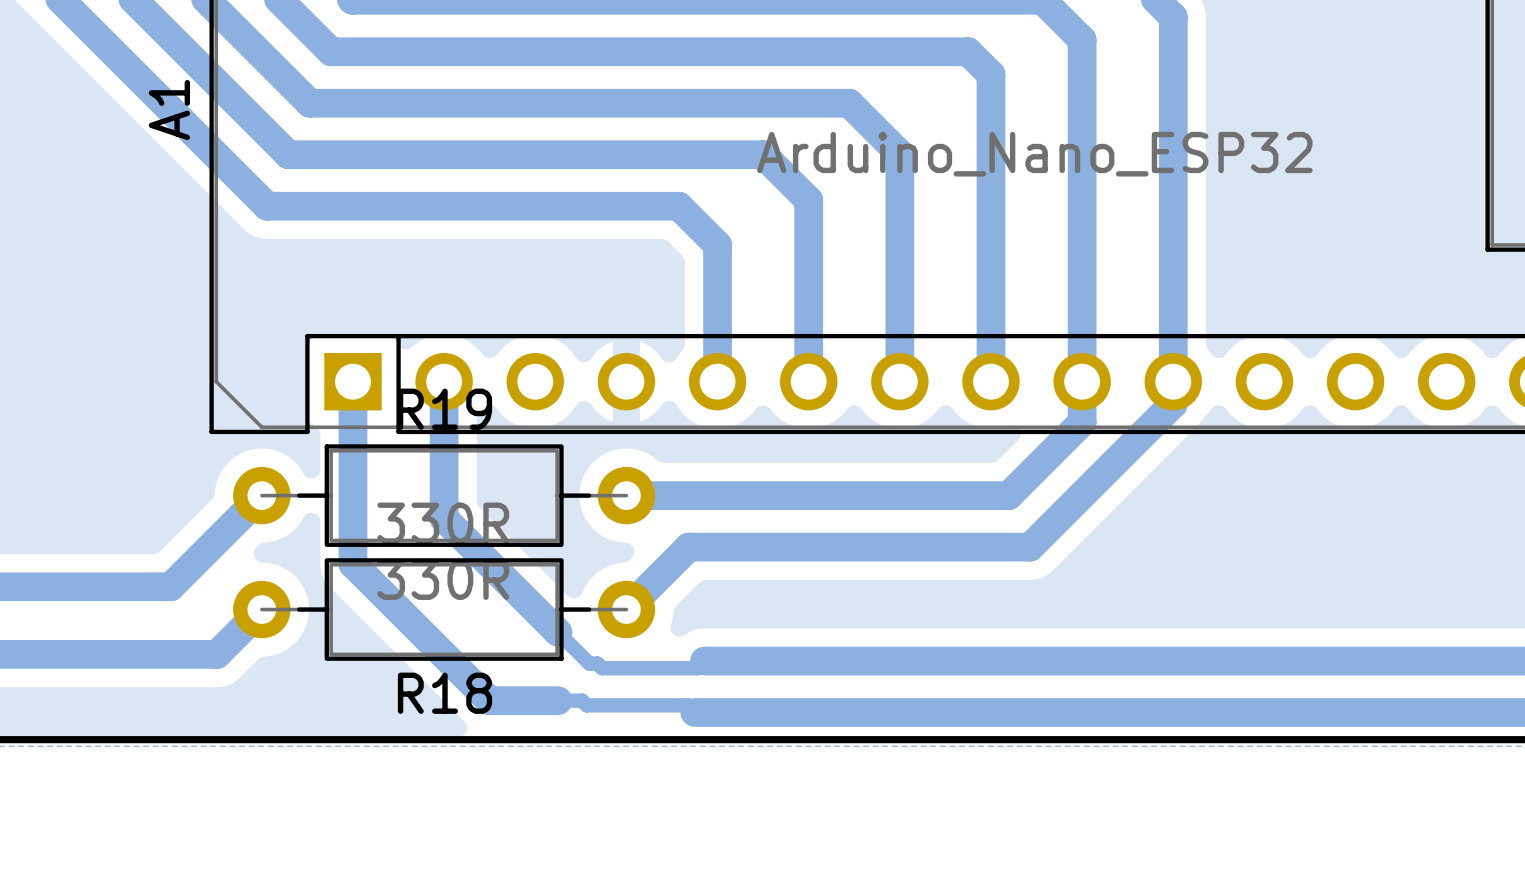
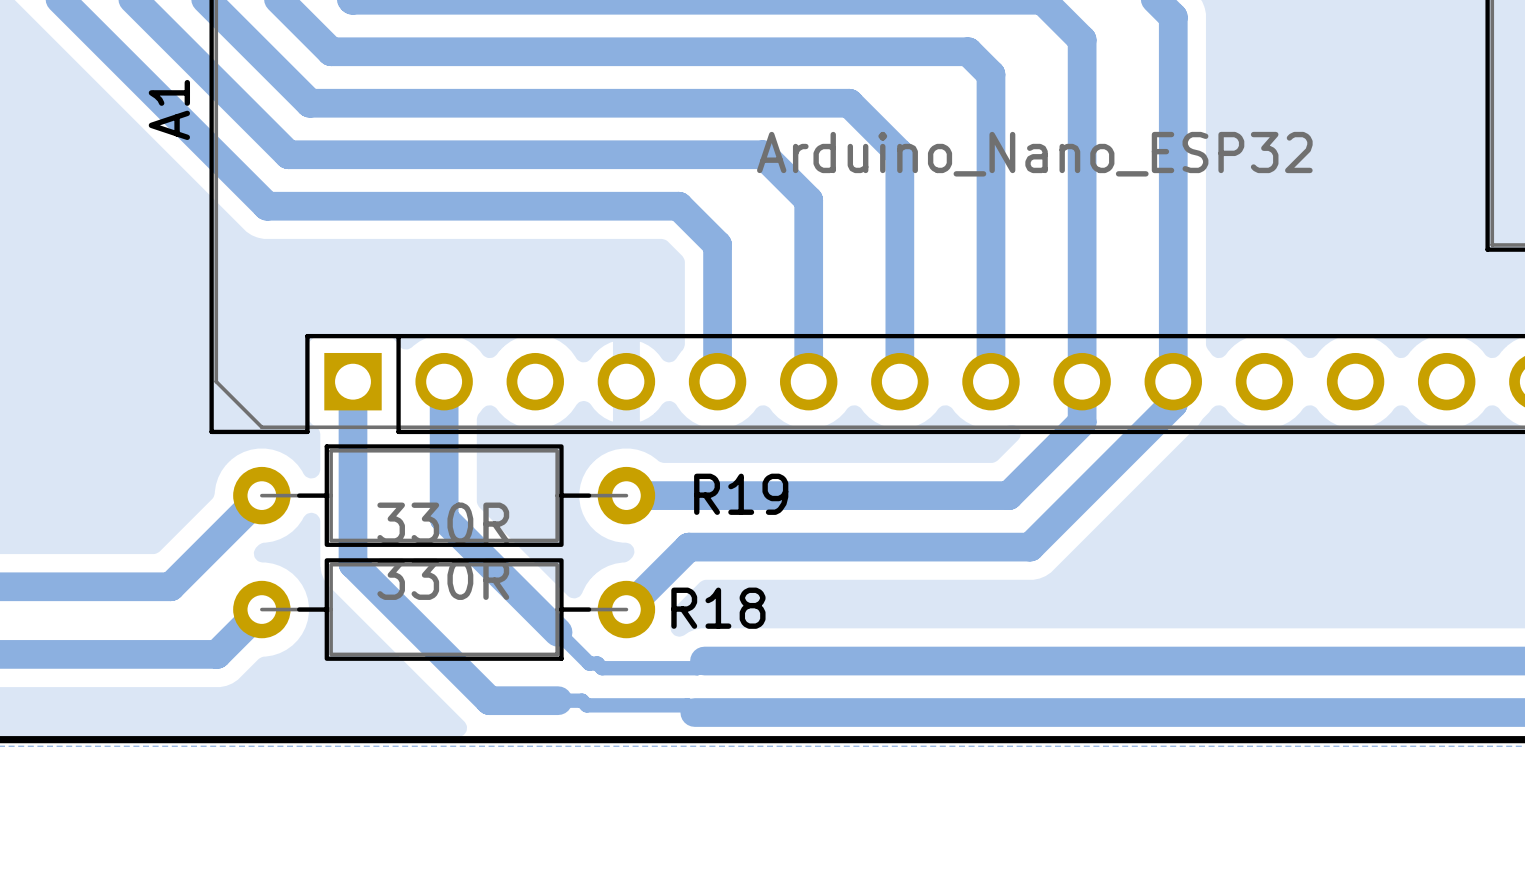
R19 name position: R19 (444, 409) -> R19 (741, 494)
R18 name position: R18 (444, 693) -> R18 (718, 608)

